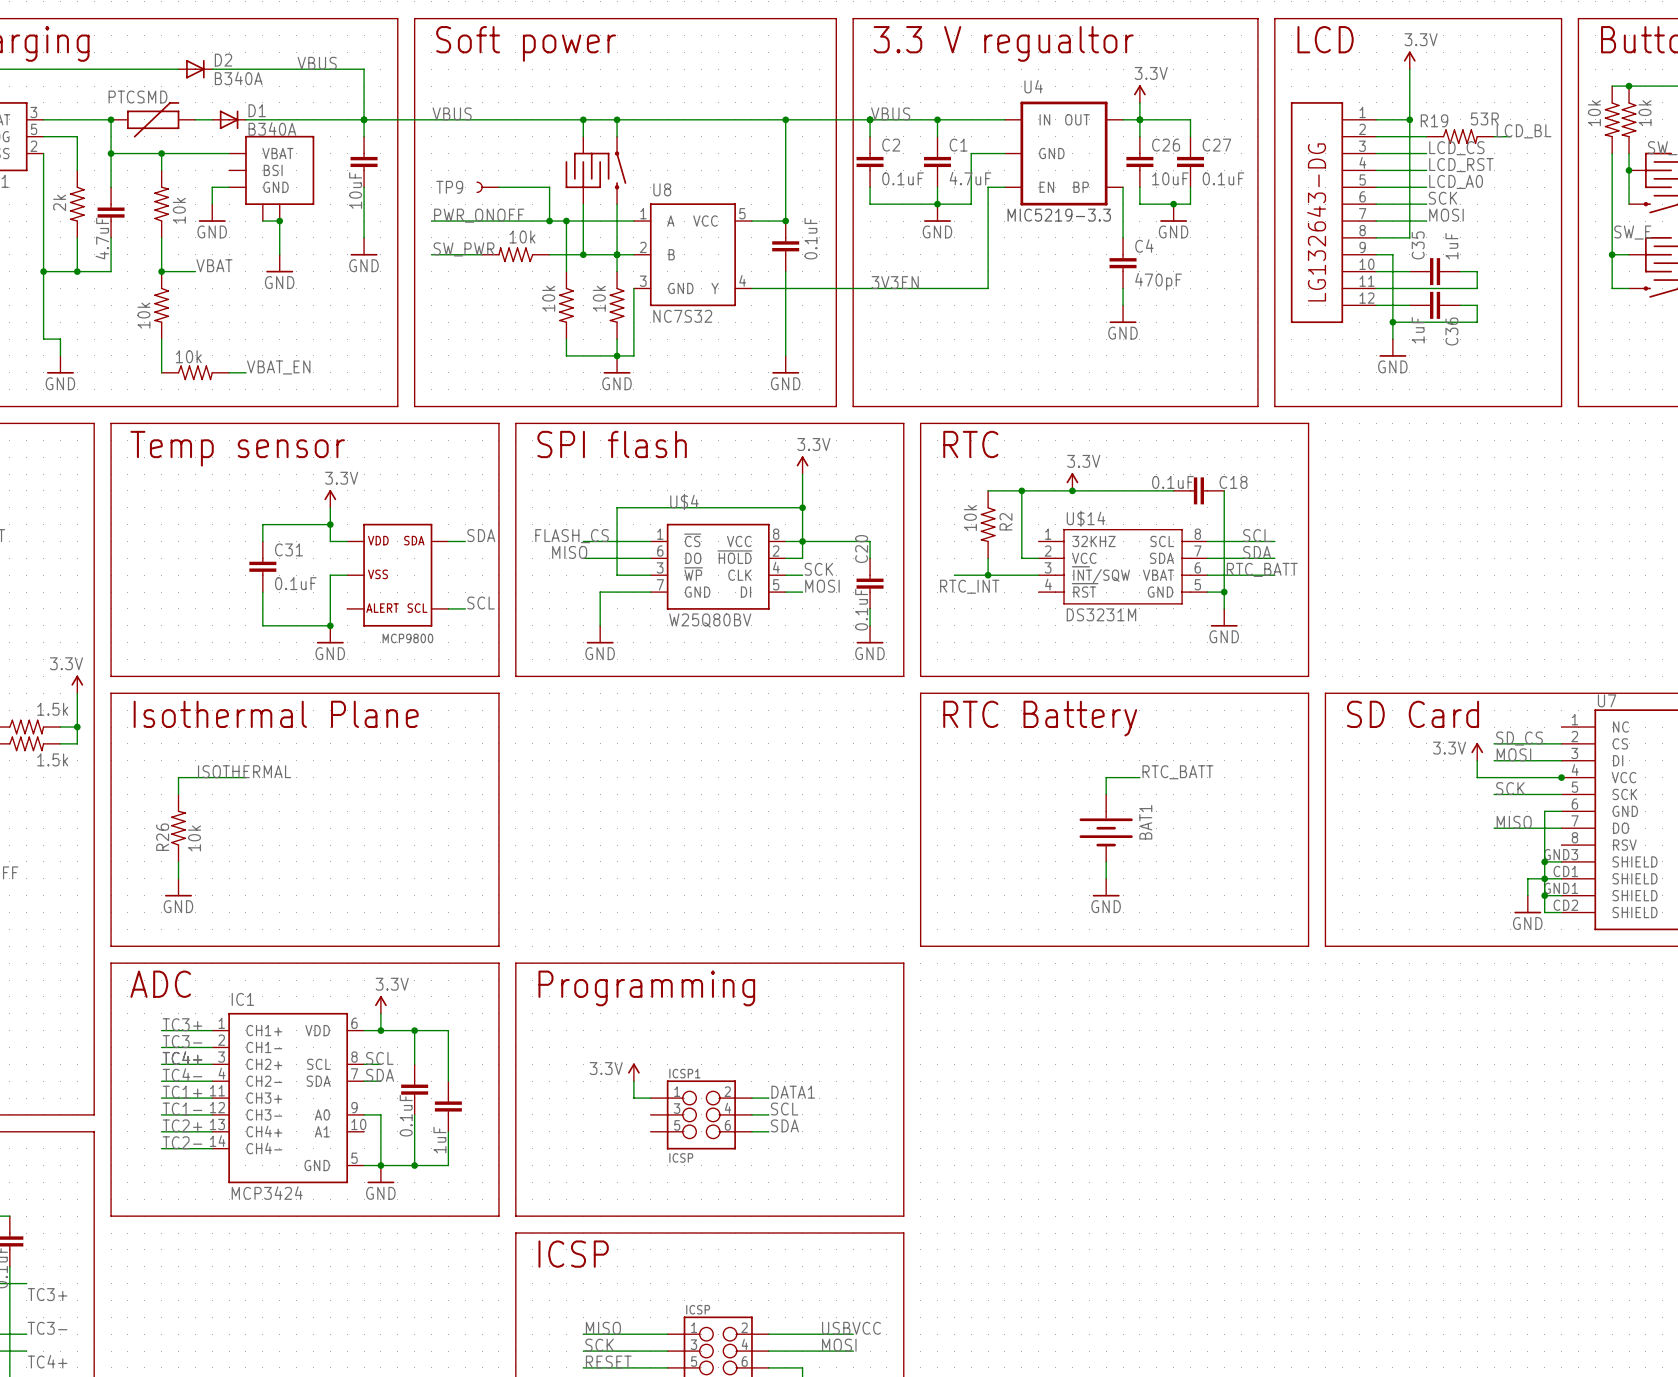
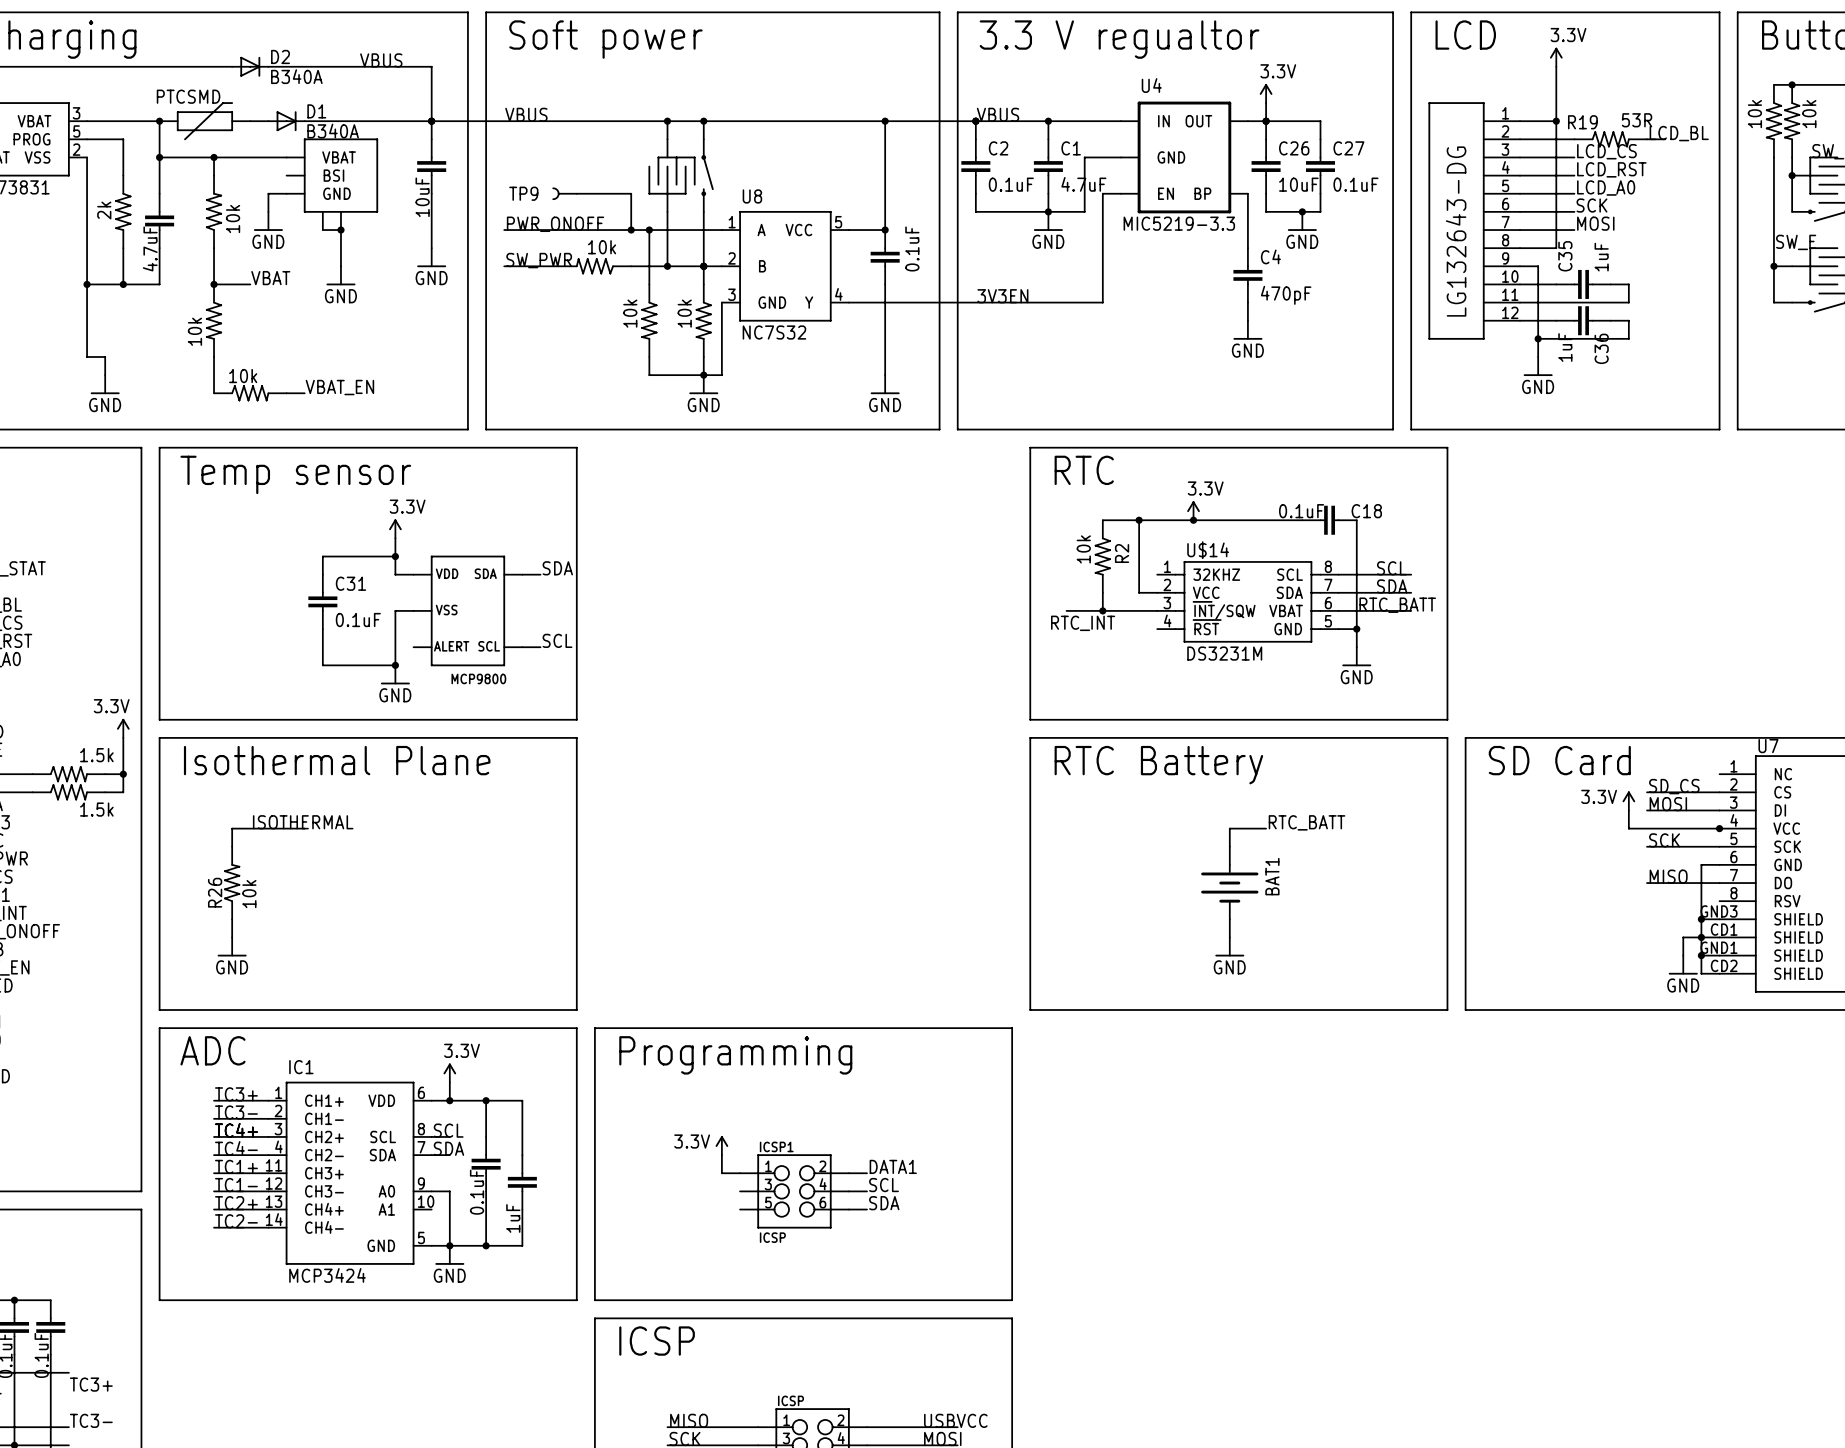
line: (515, 423) (515, 676) (903, 676) (903, 423) (515, 423) -> none
text: SPI flash (612, 444) -> none
power symbol: 3.3V (802, 465) -> none
wire: (802, 474) (802, 558) (785, 558) -> none
wire: (802, 507) (617, 507) (617, 575) (650, 575) -> none
junction: (802, 507) -> none
label: FLASH_CS (572, 536) -> none
wire: (583, 541) (650, 541) -> none
wire: (785, 541) (870, 541) (870, 558) -> none
junction: (802, 541) -> none
label: MISO (569, 552) -> none
wire: (583, 558) (650, 558) -> none
U$4: W25Q80BV (718, 566) -> none
label: SCK (818, 569) -> none
wire: (785, 575) (802, 575) -> none
C20: 0.1uF (870, 583) -> none
label: MOSI (822, 586) -> none
wire: (650, 592) (600, 592) (600, 625) -> none
wire: (785, 592) (802, 592) -> none
wire: (870, 608) (870, 625) -> none
power symbol: GND (600, 634) -> none
power symbol: GND (870, 634) -> none

